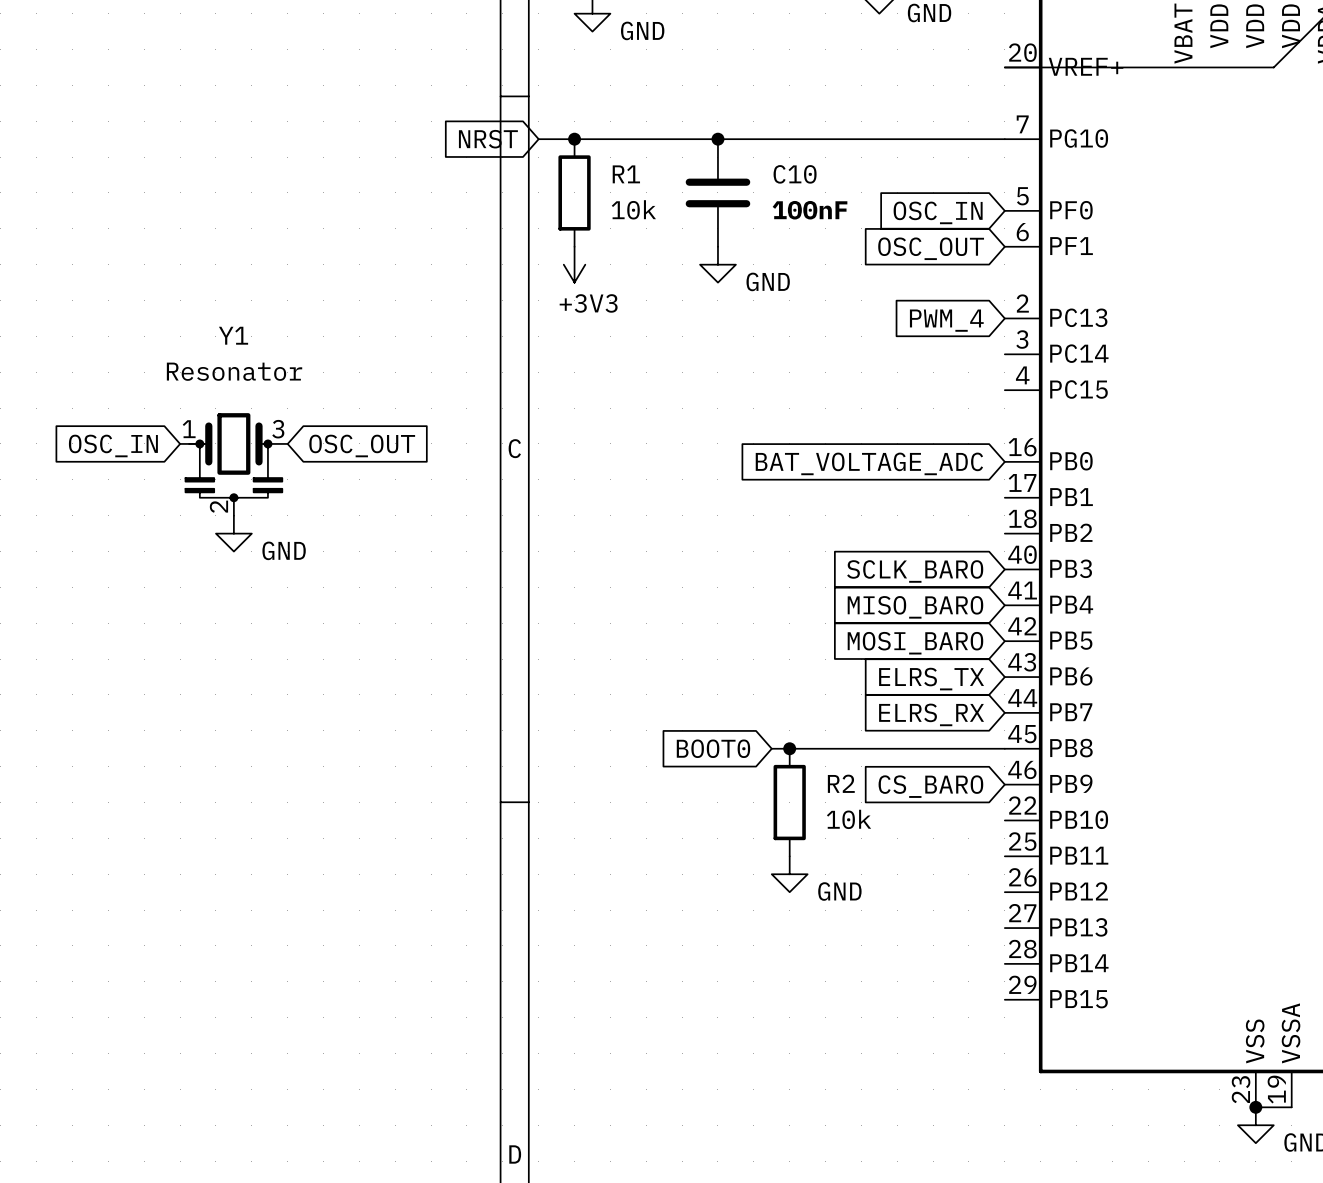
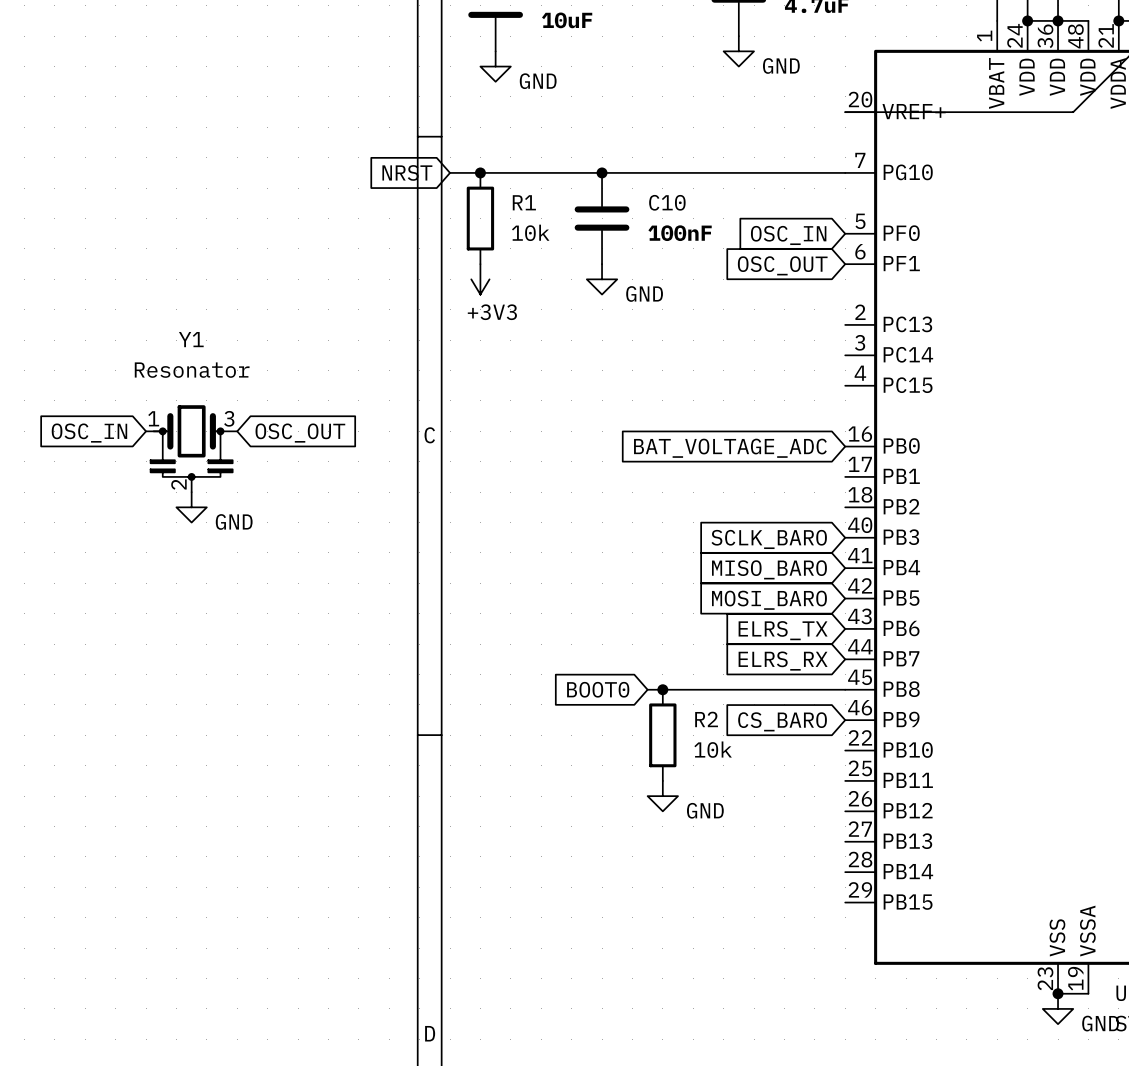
global label: PWM_4 (946, 320) -> none

